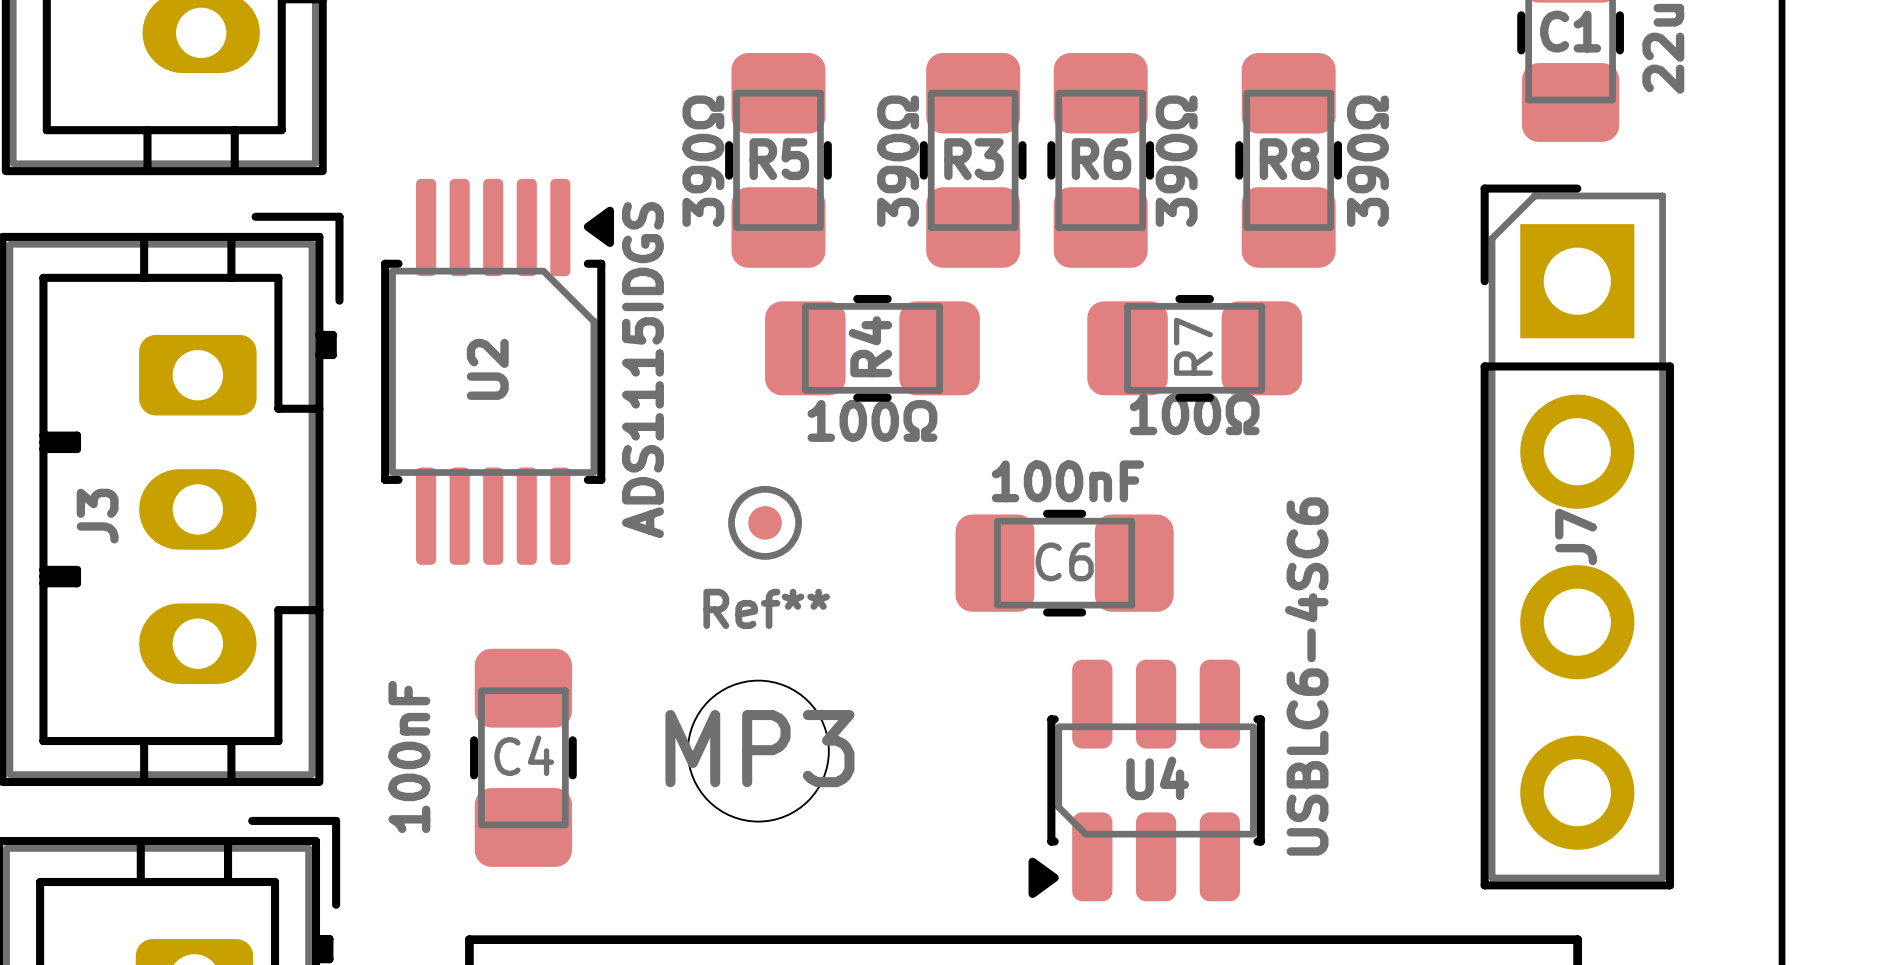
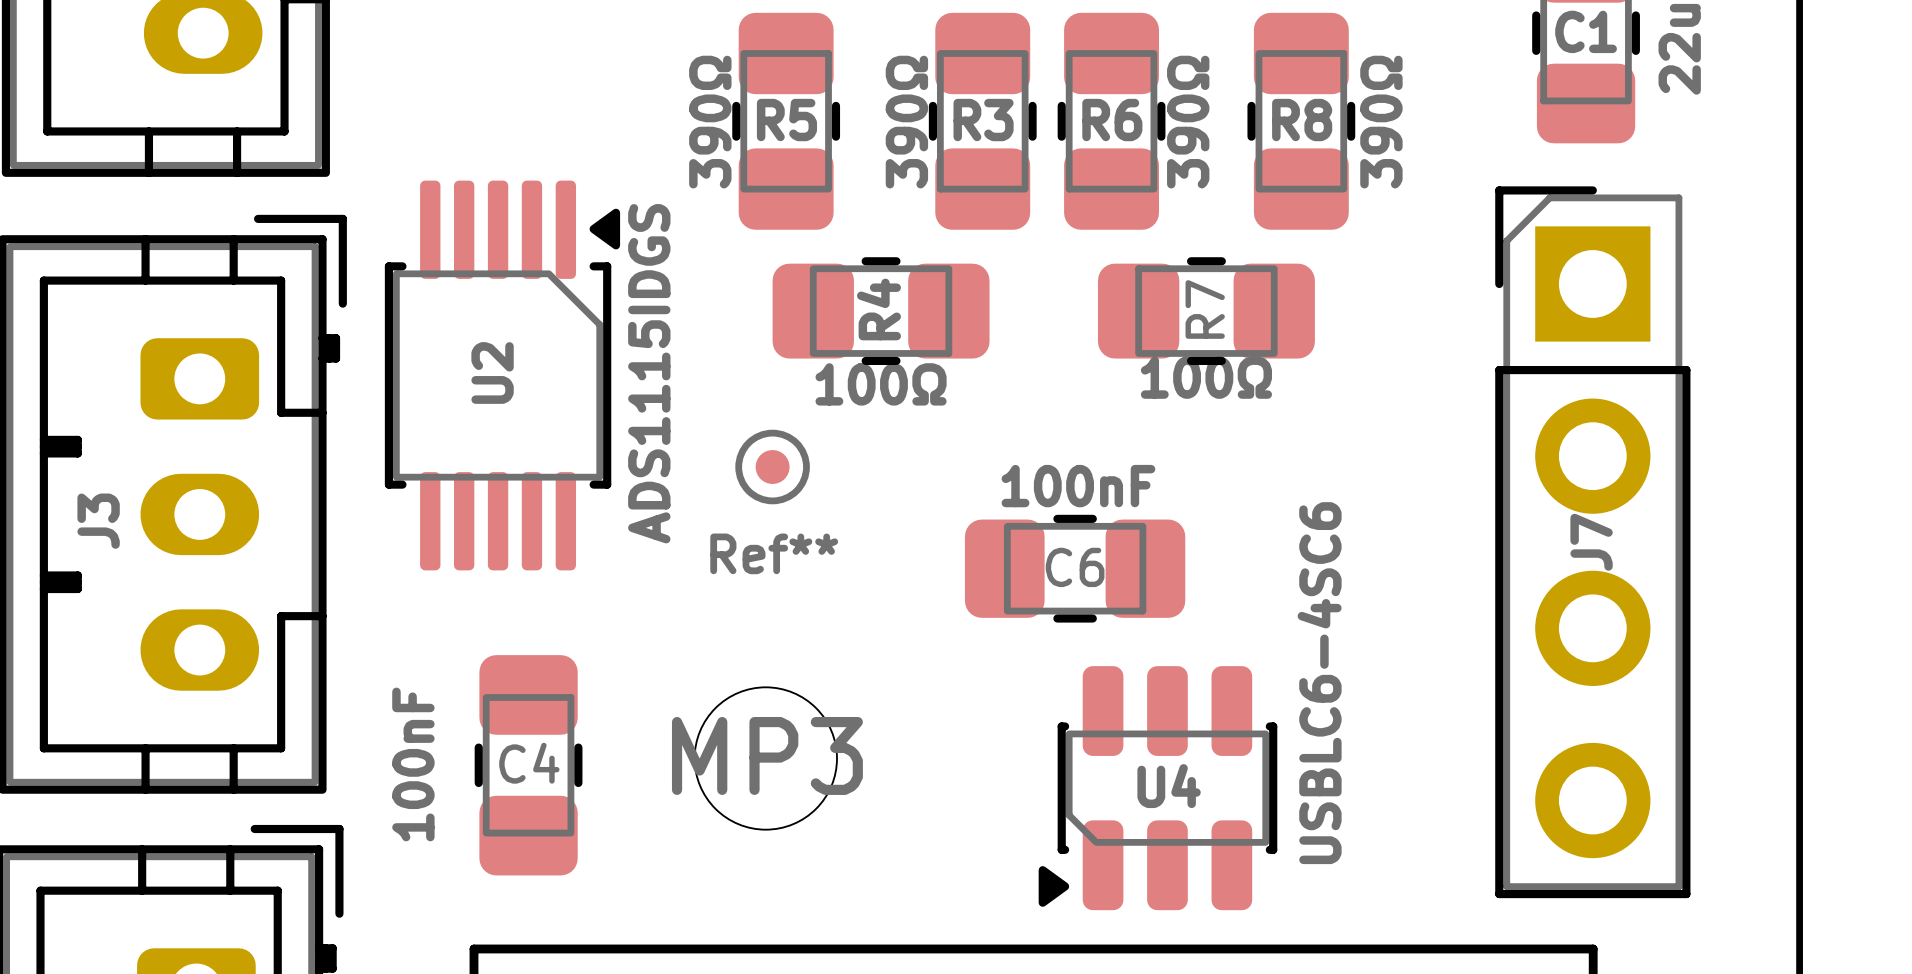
R5 position: (778, 160) -> (786, 121)
R3 position: (973, 160) -> (982, 121)
R6 position: (1100, 160) -> (1111, 121)
R8 position: (1288, 160) -> (1301, 121)
R4 position: (872, 348) -> (881, 311)
R7 position: (1194, 348) -> (1206, 311)
Ref** position: (765, 522) -> (772, 467)

